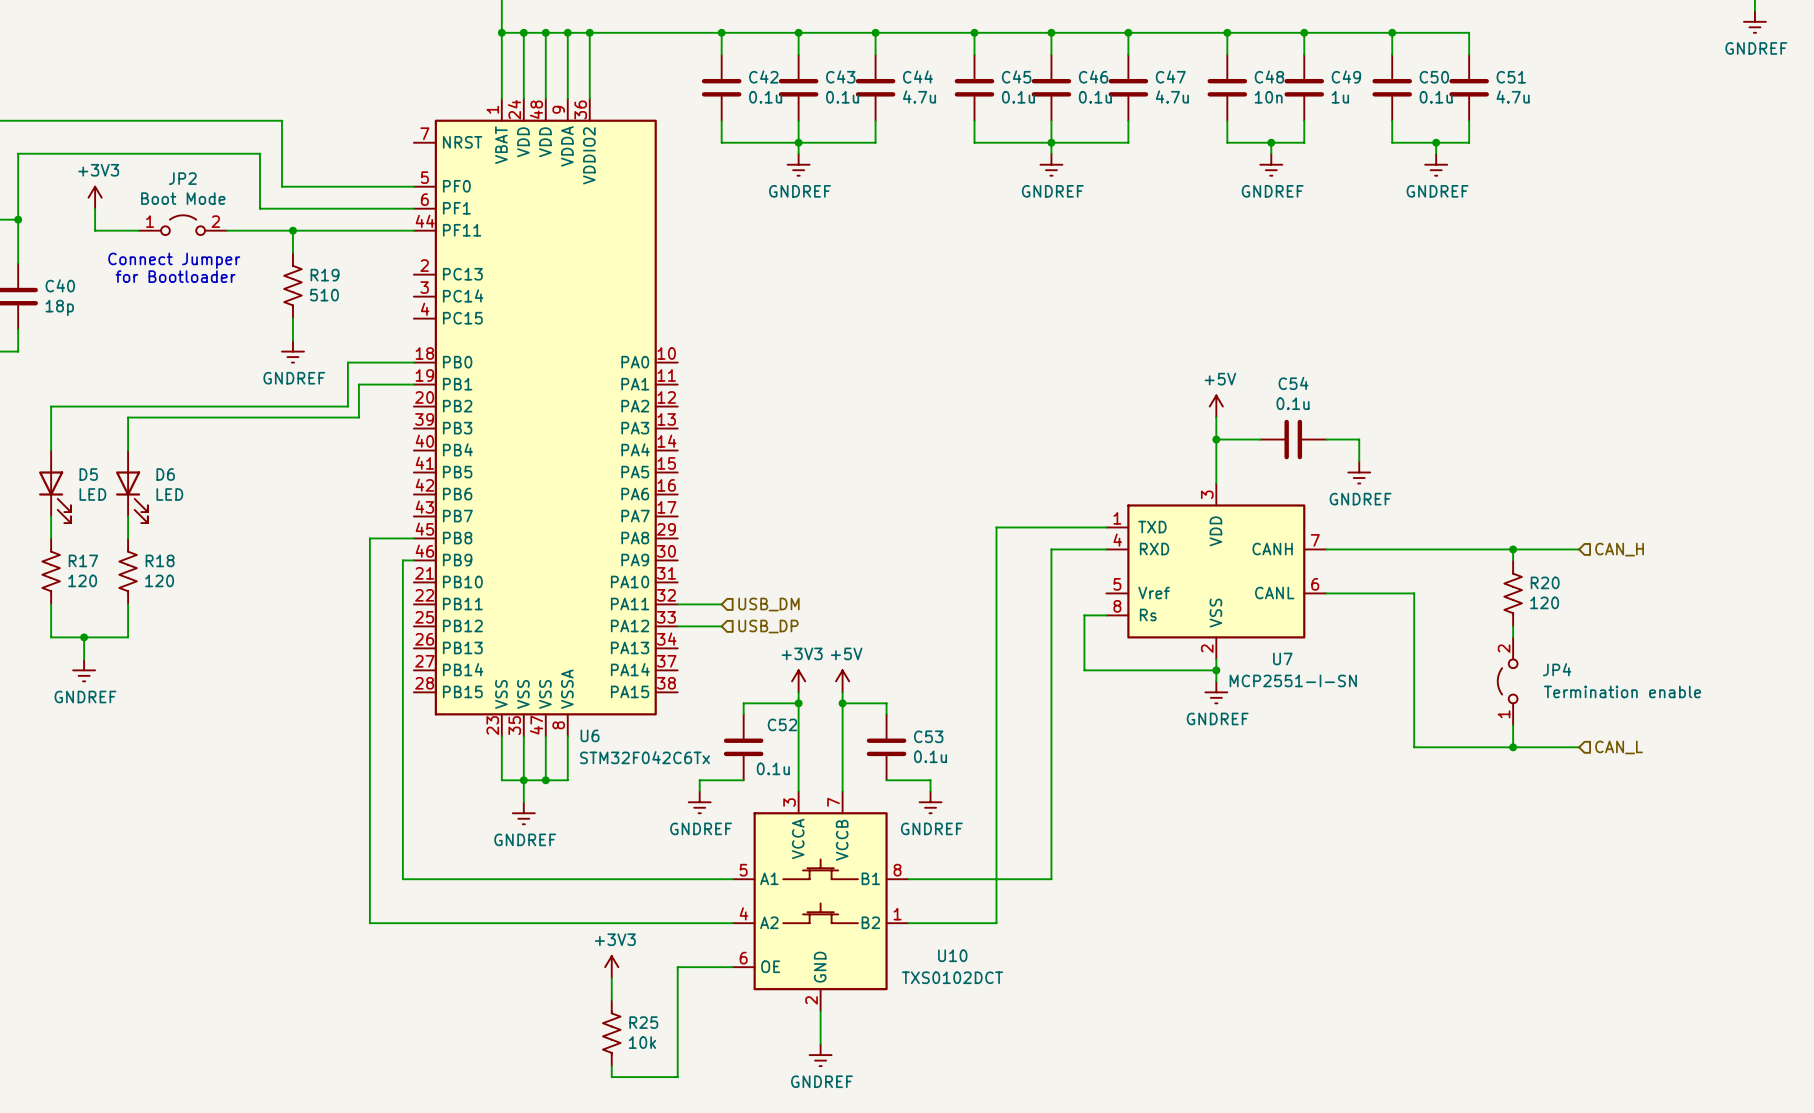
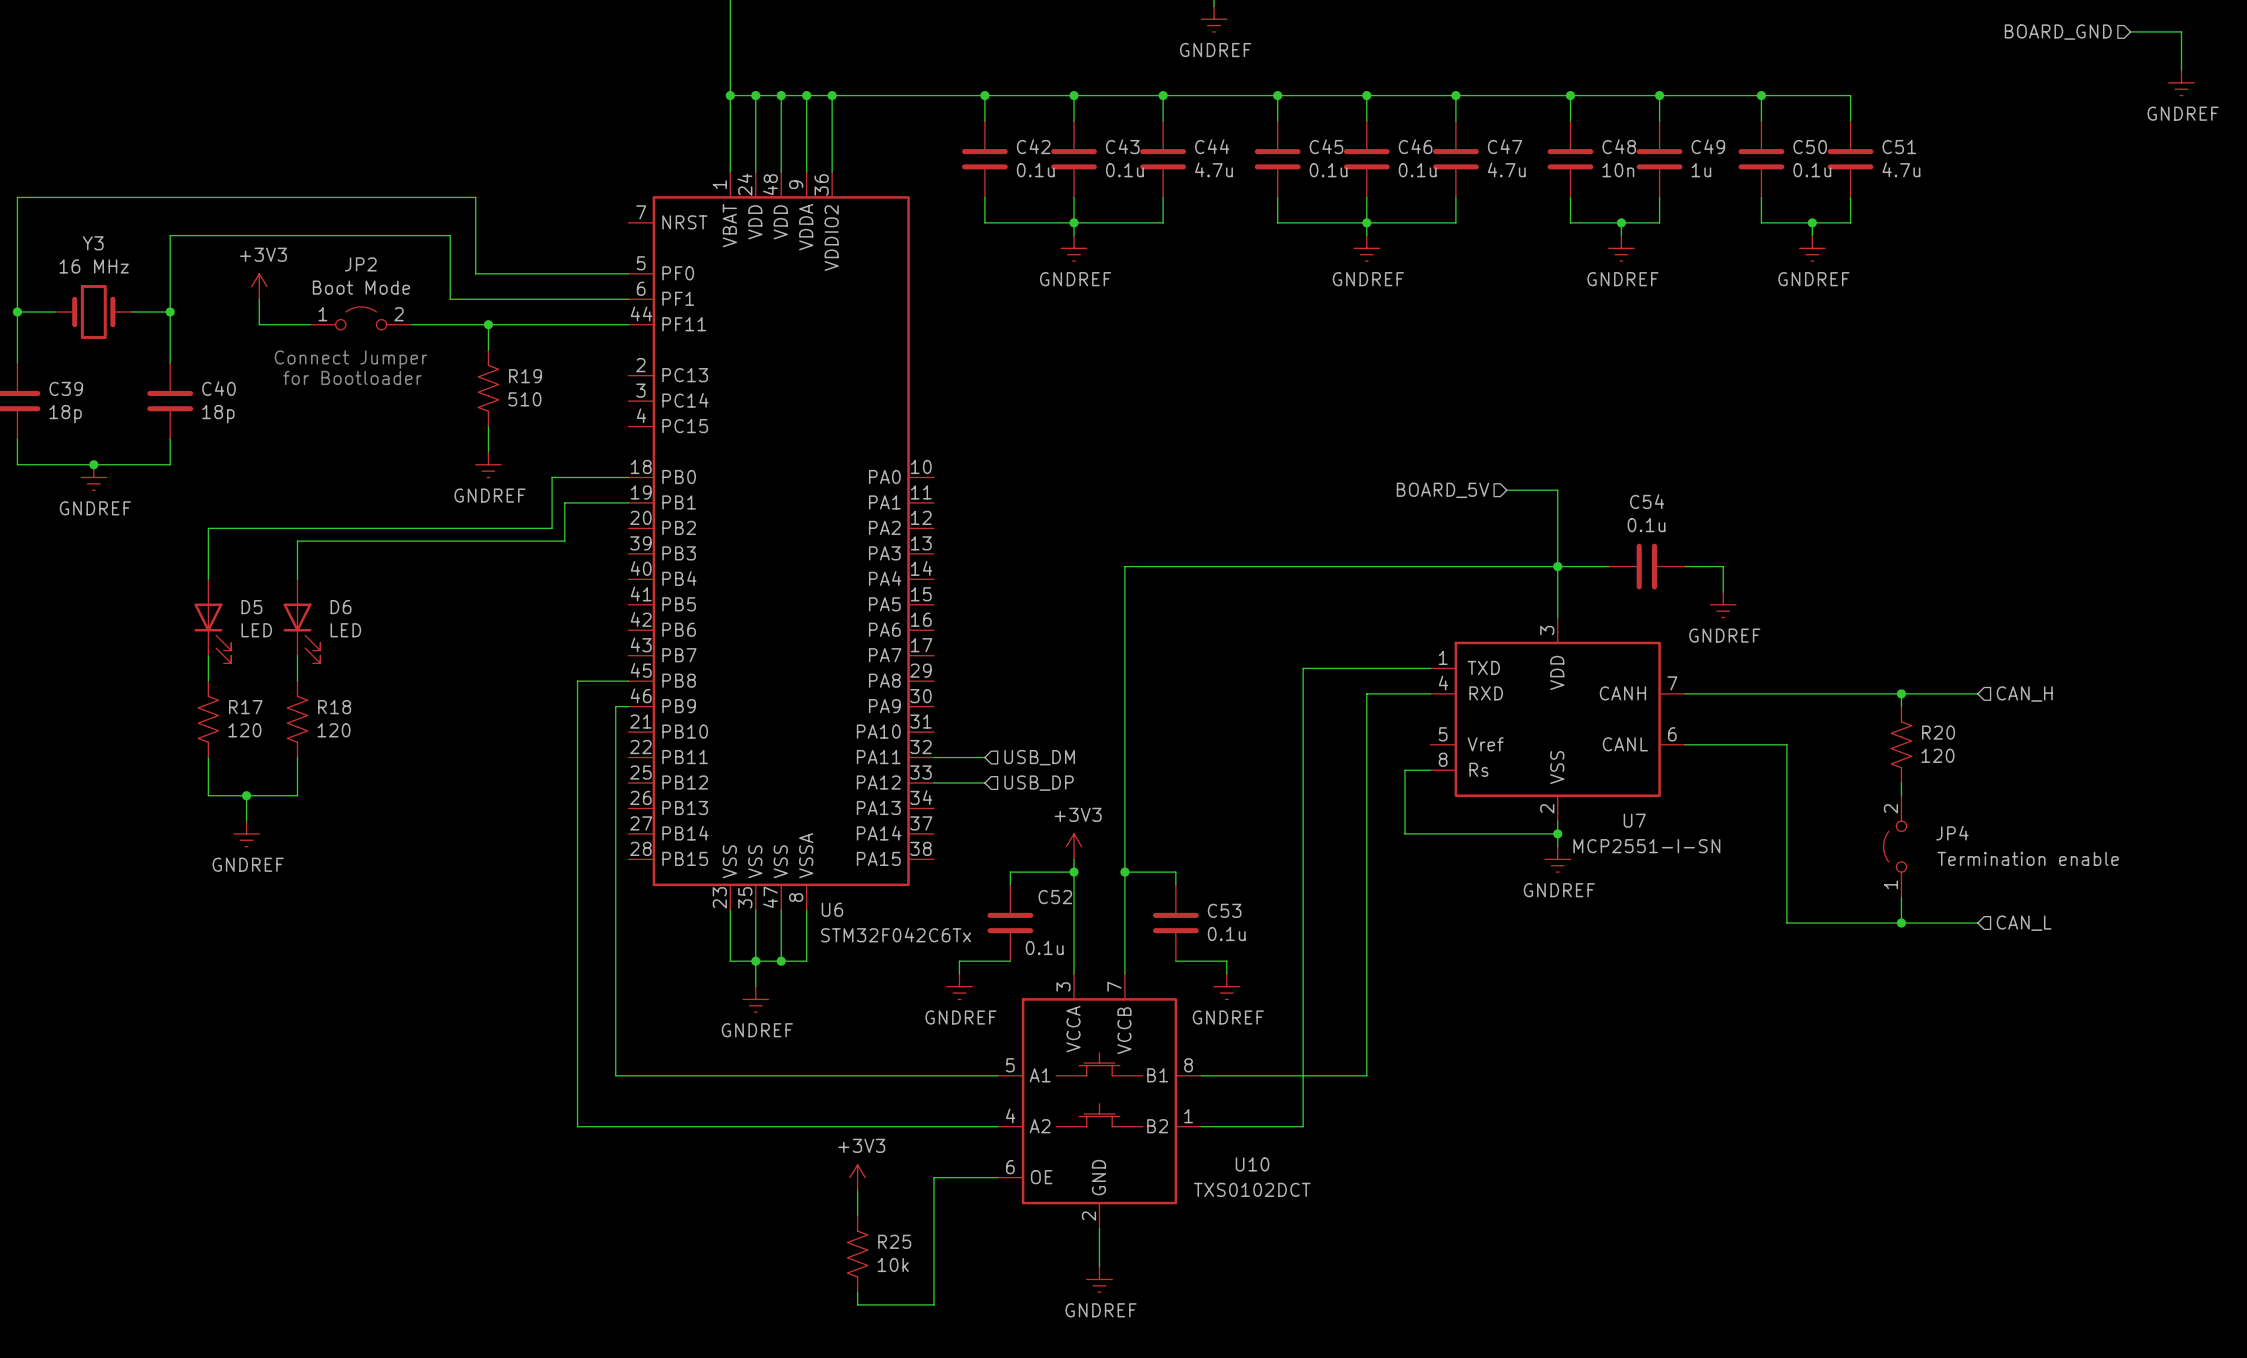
hierarchical label: none -> BOARD_5V (1442, 490)
wire: none -> (1506, 490) (1557, 490) (1557, 541)
power symbol: +5V (1216, 406) -> none
wire: none -> (1557, 566) (1124, 566) (1124, 859)
power symbol: +5V (842, 681) -> none

